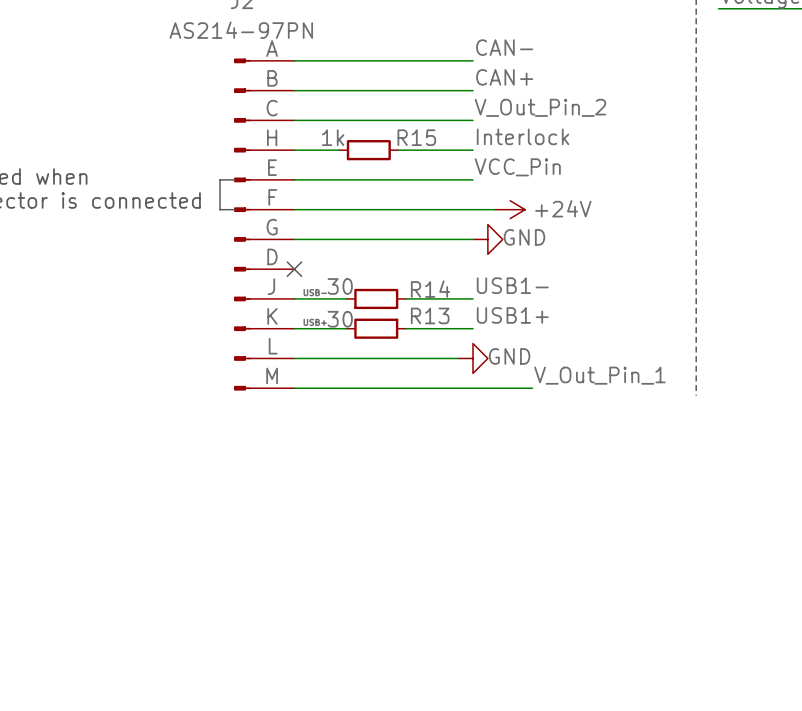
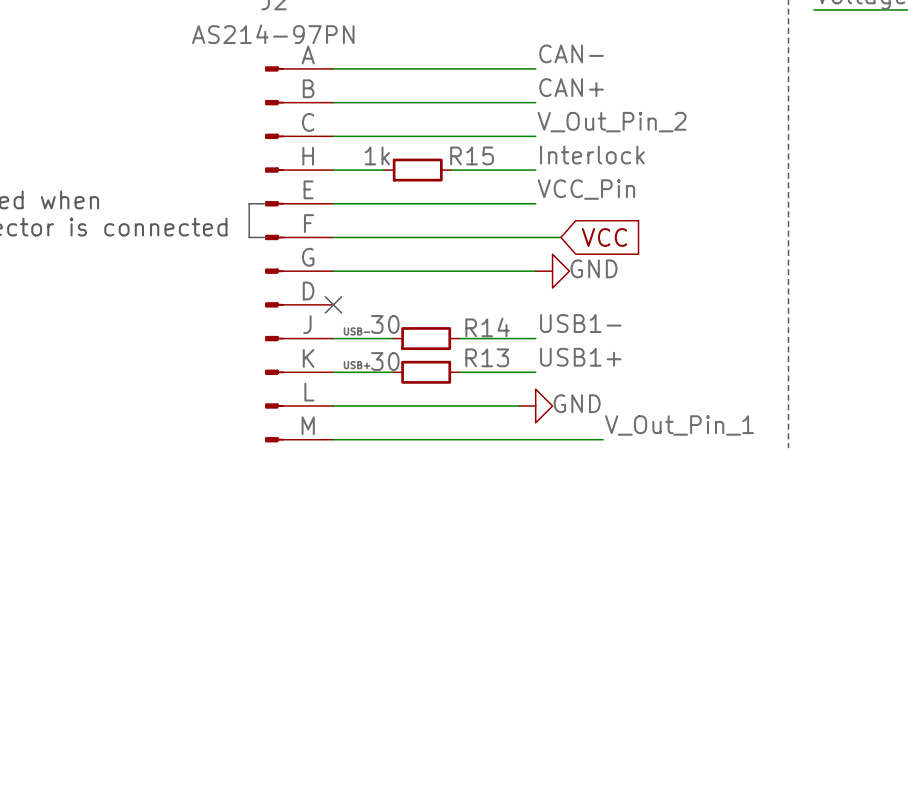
power symbol: +24V (510, 209) -> none
global label: none -> VCC (604, 237)

